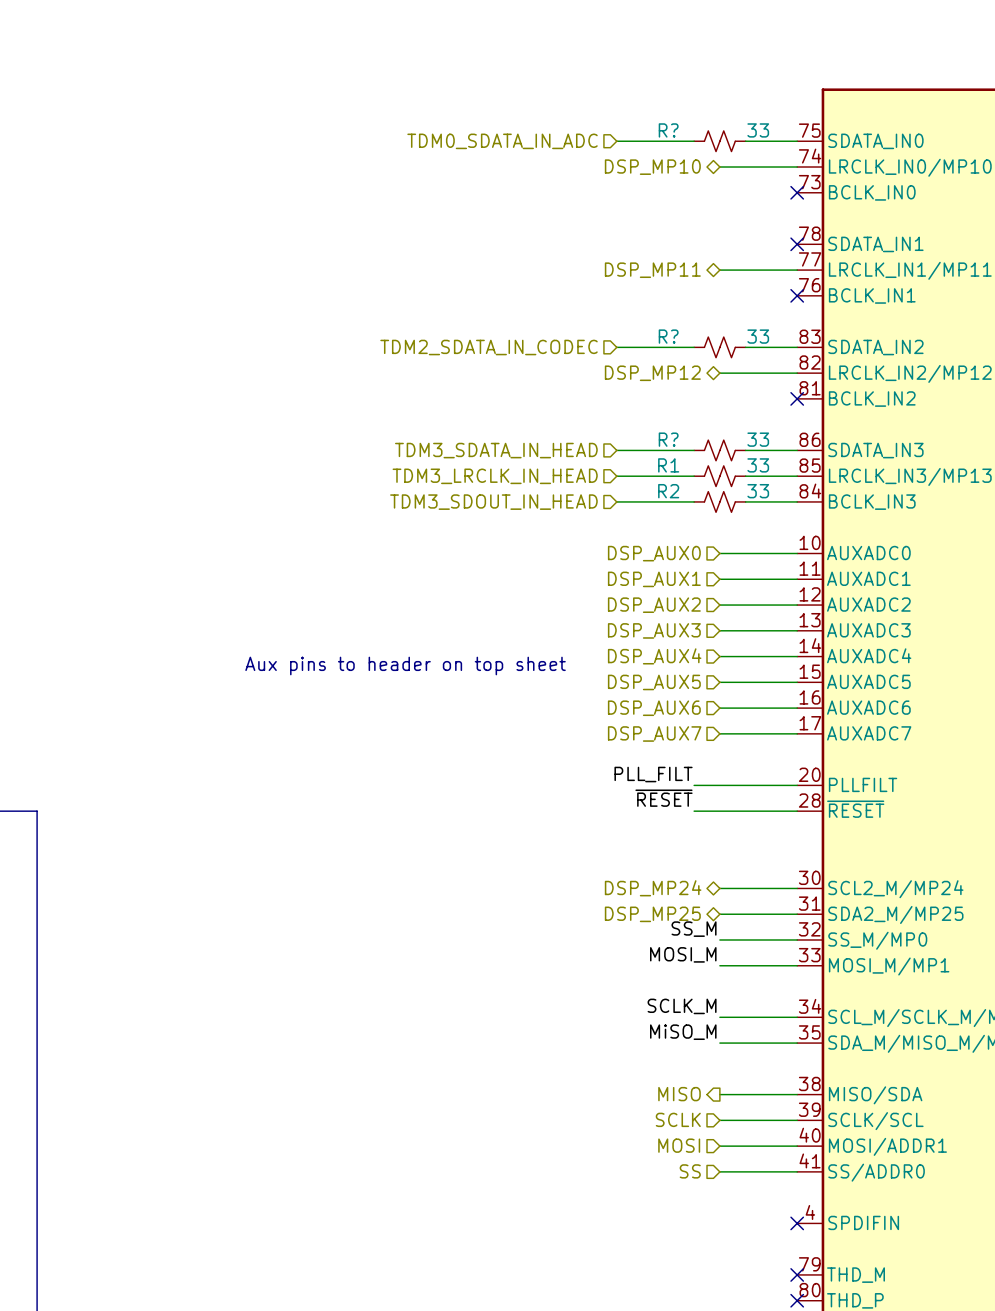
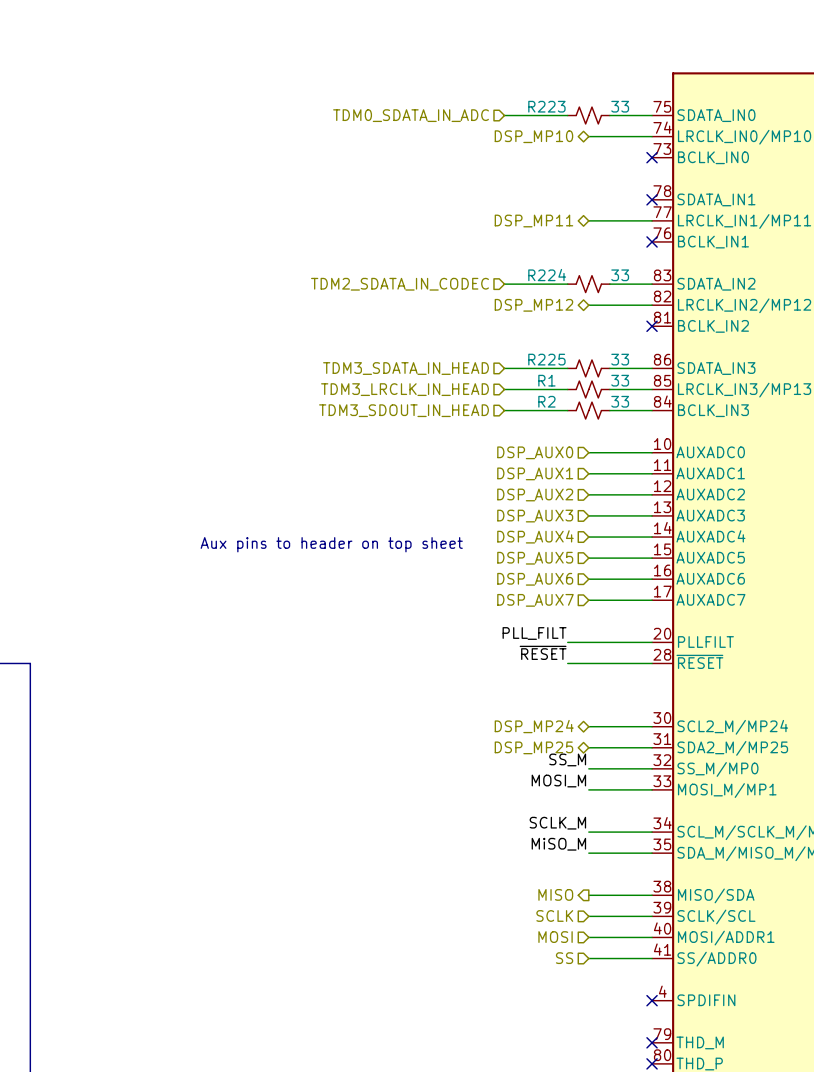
R? name: R? (668, 130) -> R223 (546, 106)
R? name: R? (668, 336) -> R224 (547, 275)
R? name: R? (668, 439) -> R225 (546, 359)

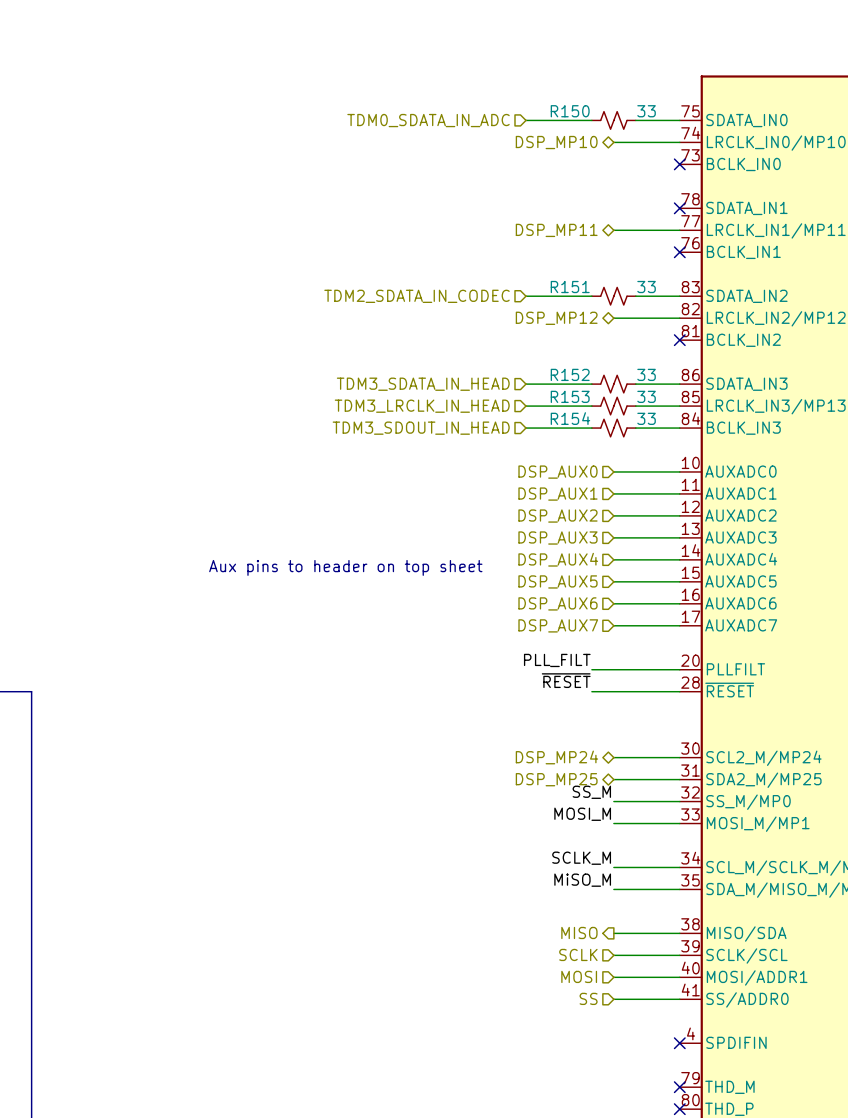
R223 name: R223 (546, 106) -> R150 (570, 111)
R224 name: R224 (547, 275) -> R151 (570, 287)
R225 name: R225 (546, 359) -> R152 (570, 374)
R1 name: R1 (546, 380) -> R153 (570, 396)
R2 name: R2 (546, 401) -> R154 (570, 418)

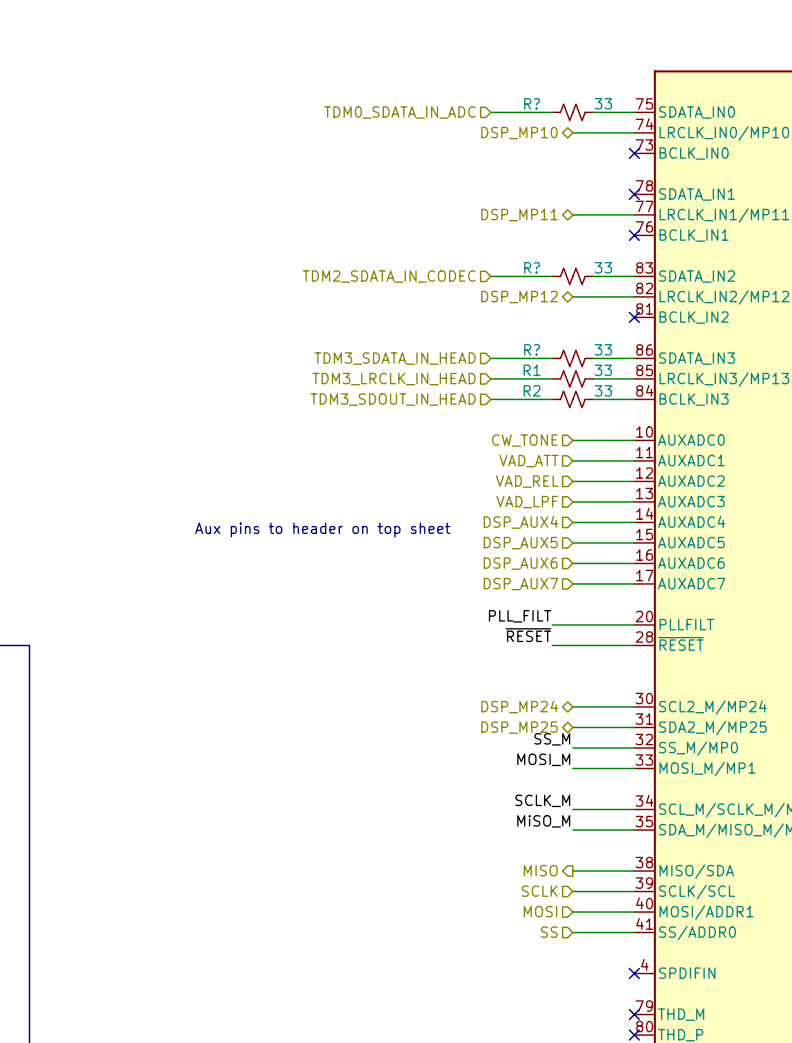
R150 name: R150 (570, 111) -> R? (532, 103)
R151 name: R151 (570, 287) -> R? (532, 267)
R152 name: R152 (570, 374) -> R? (532, 349)
R153 name: R153 (570, 396) -> R1 (532, 370)
R154 name: R154 (570, 418) -> R2 (532, 390)
hierarchical label: DSP_AUX0 (557, 472) -> CW_TONE (524, 440)
hierarchical label: DSP_AUX1 (557, 494) -> VAD_ATT (529, 461)
hierarchical label: DSP_AUX2 (557, 516) -> VAD_REL (527, 481)
hierarchical label: DSP_AUX3 (557, 538) -> VAD_LPF (527, 502)

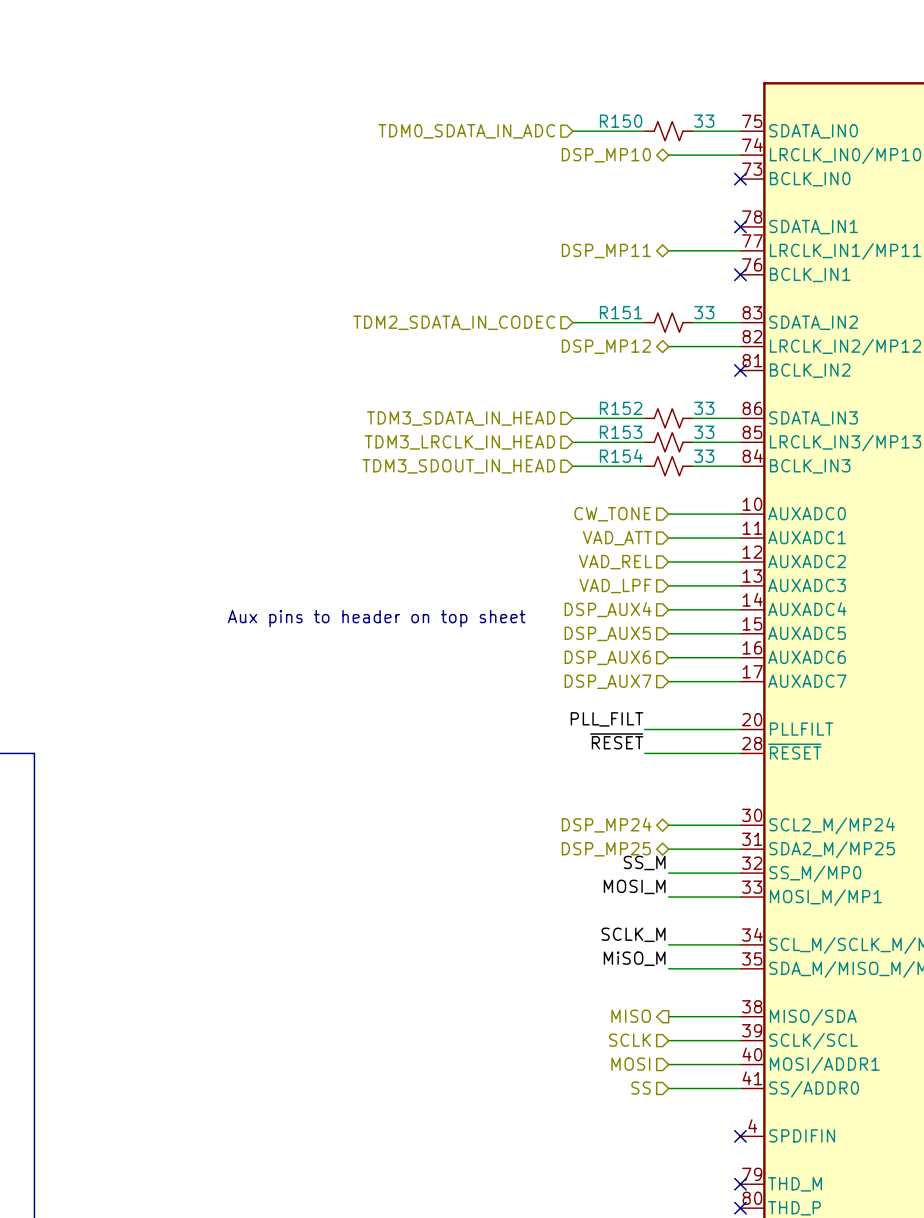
R? name: R? (532, 103) -> R150 (621, 121)
R? name: R? (532, 267) -> R151 (621, 312)
R? name: R? (532, 349) -> R152 (621, 408)
R1 name: R1 (532, 370) -> R153 (621, 432)
R2 name: R2 (532, 390) -> R154 (621, 455)

